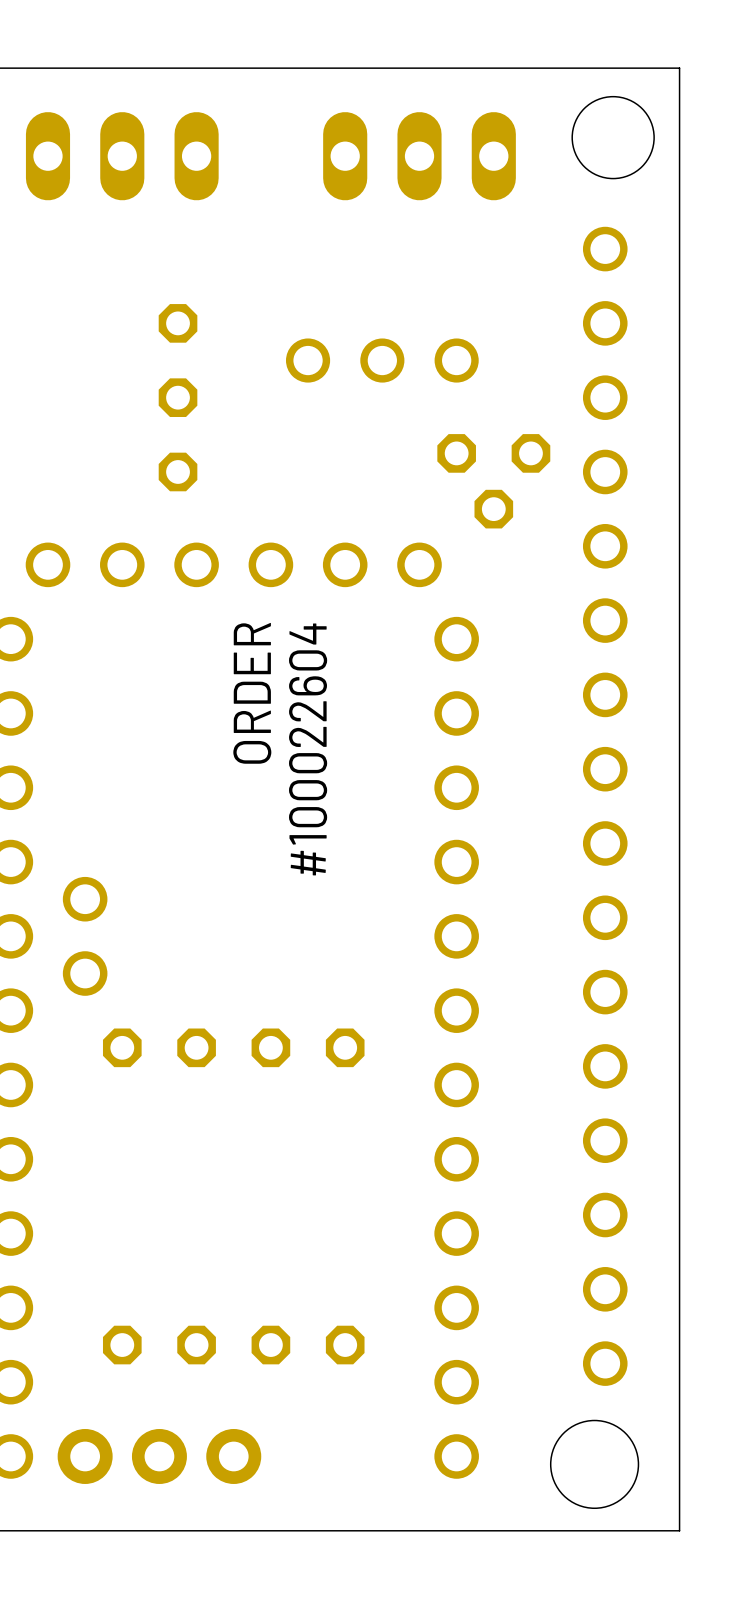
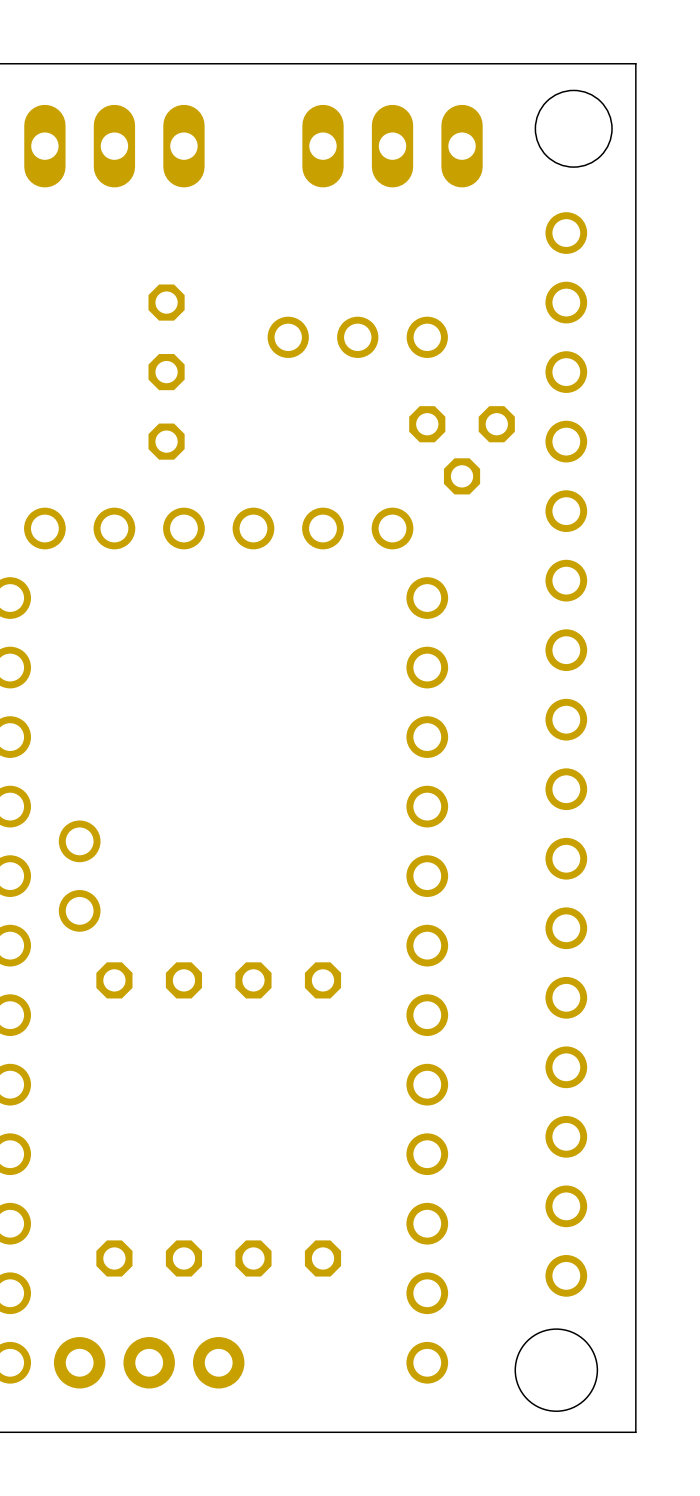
text: ORDER (252, 693) -> none
text: #100022604 (308, 749) -> none

